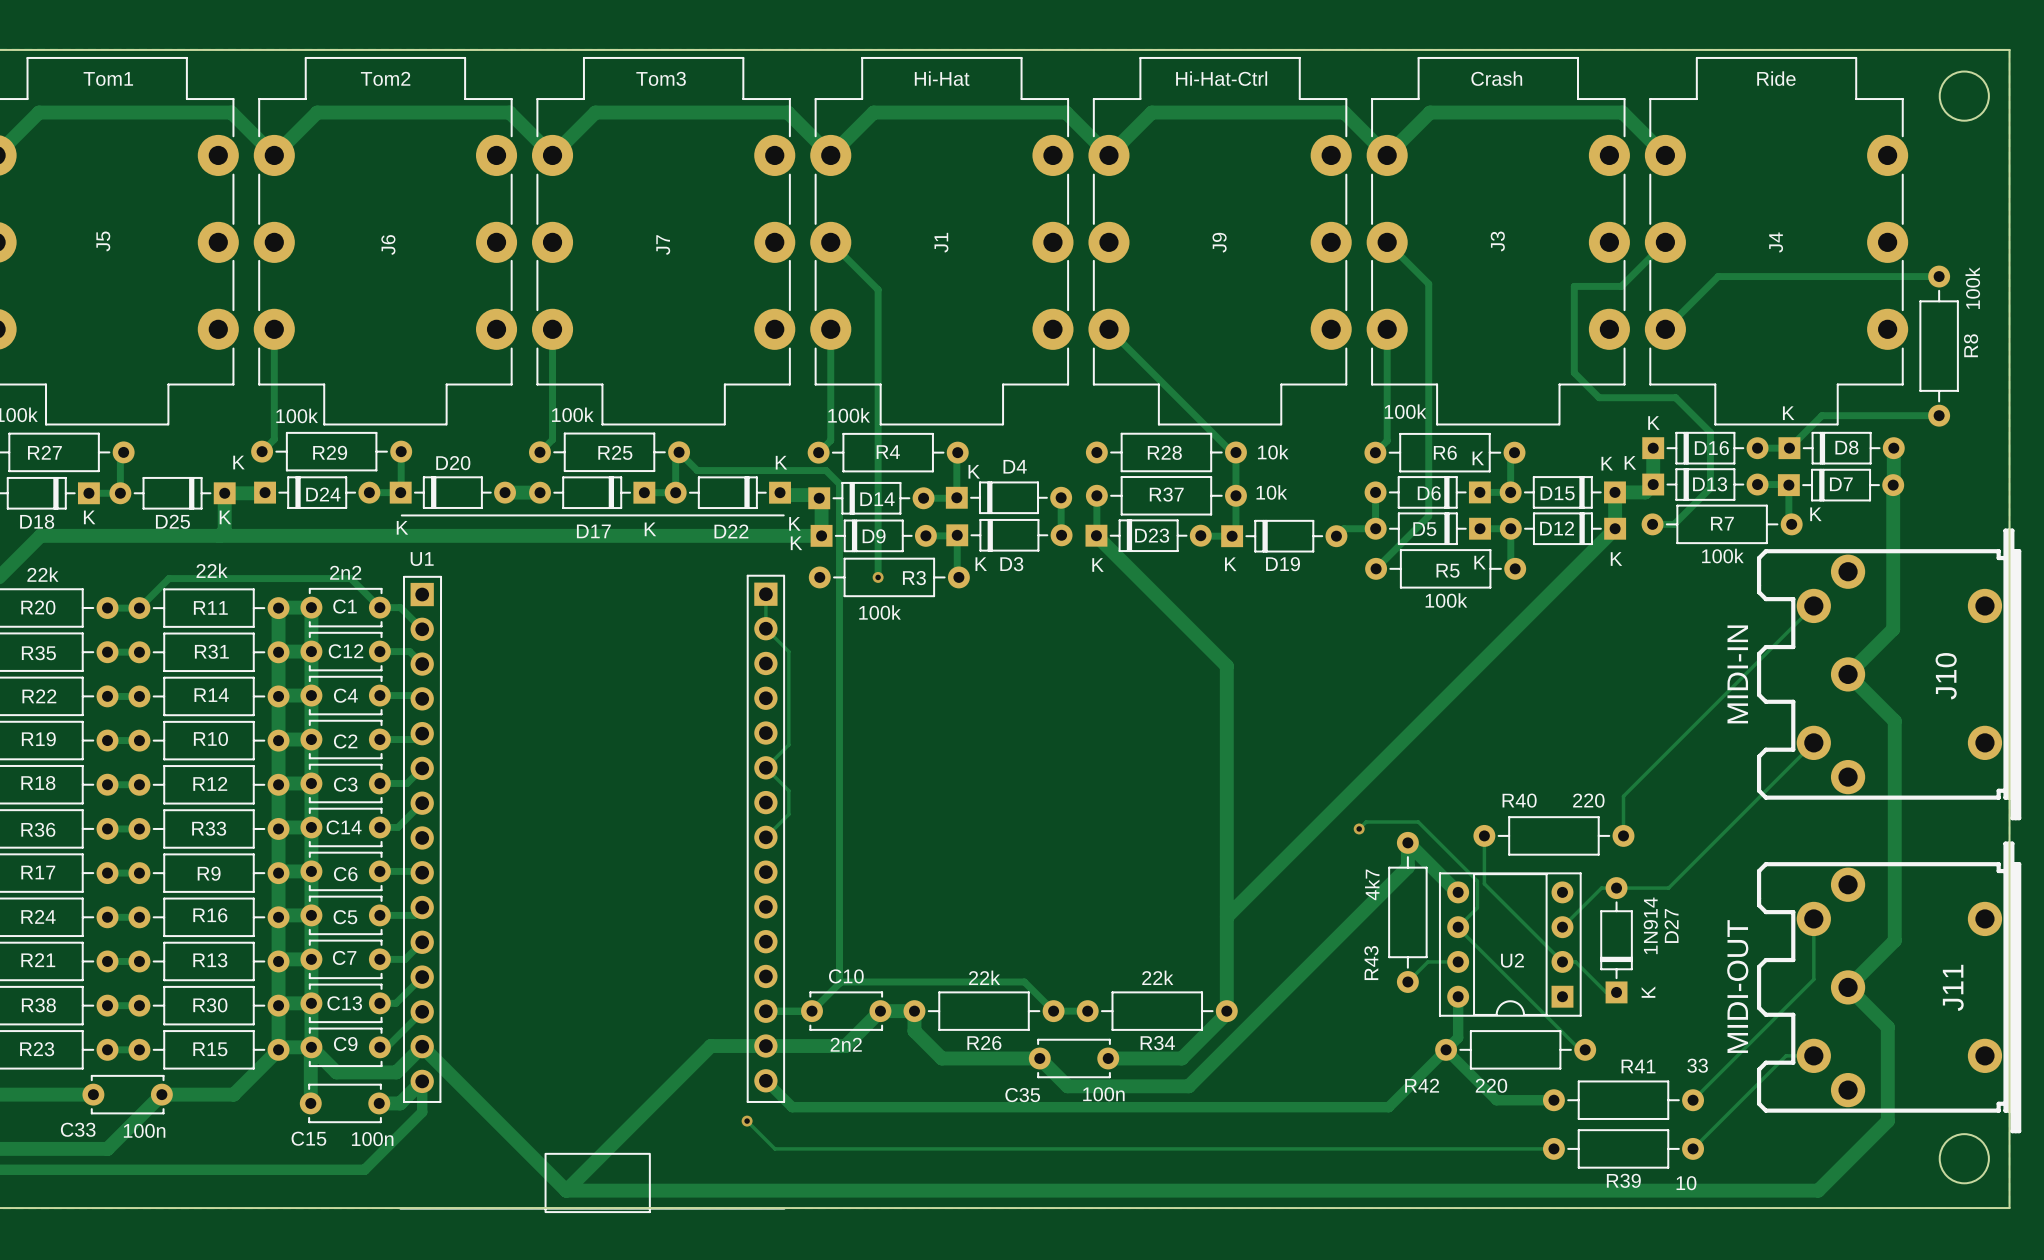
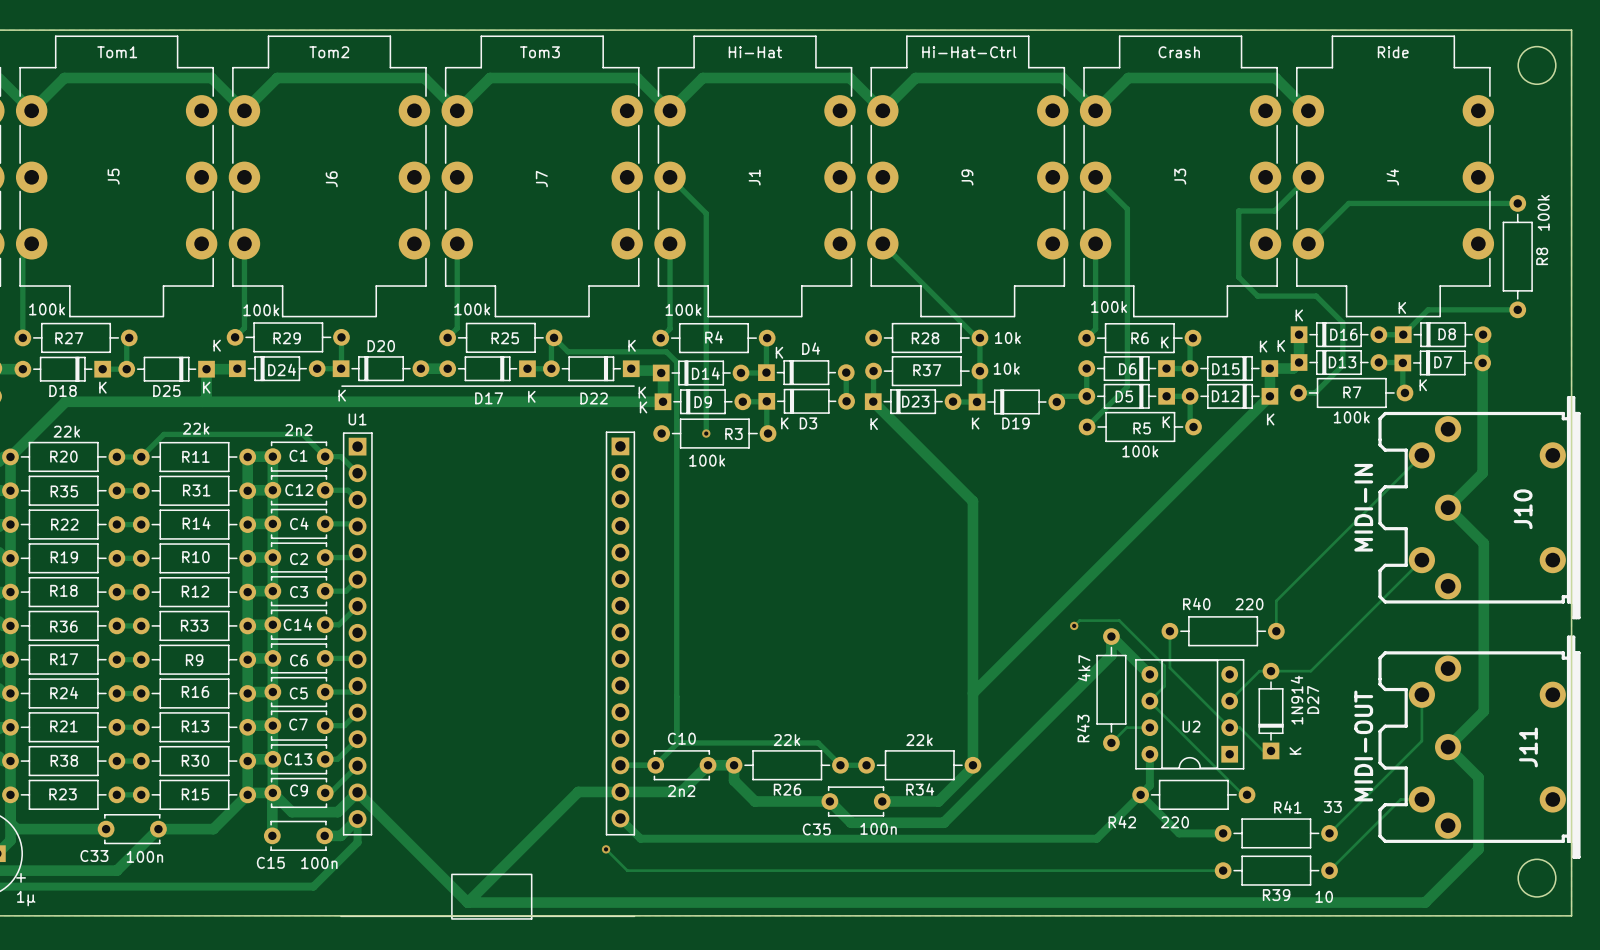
track: (765, 594) (765, 628) (788, 651) (788, 744) (765, 767) (788, 790) (788, 814) (765, 837) -> none

